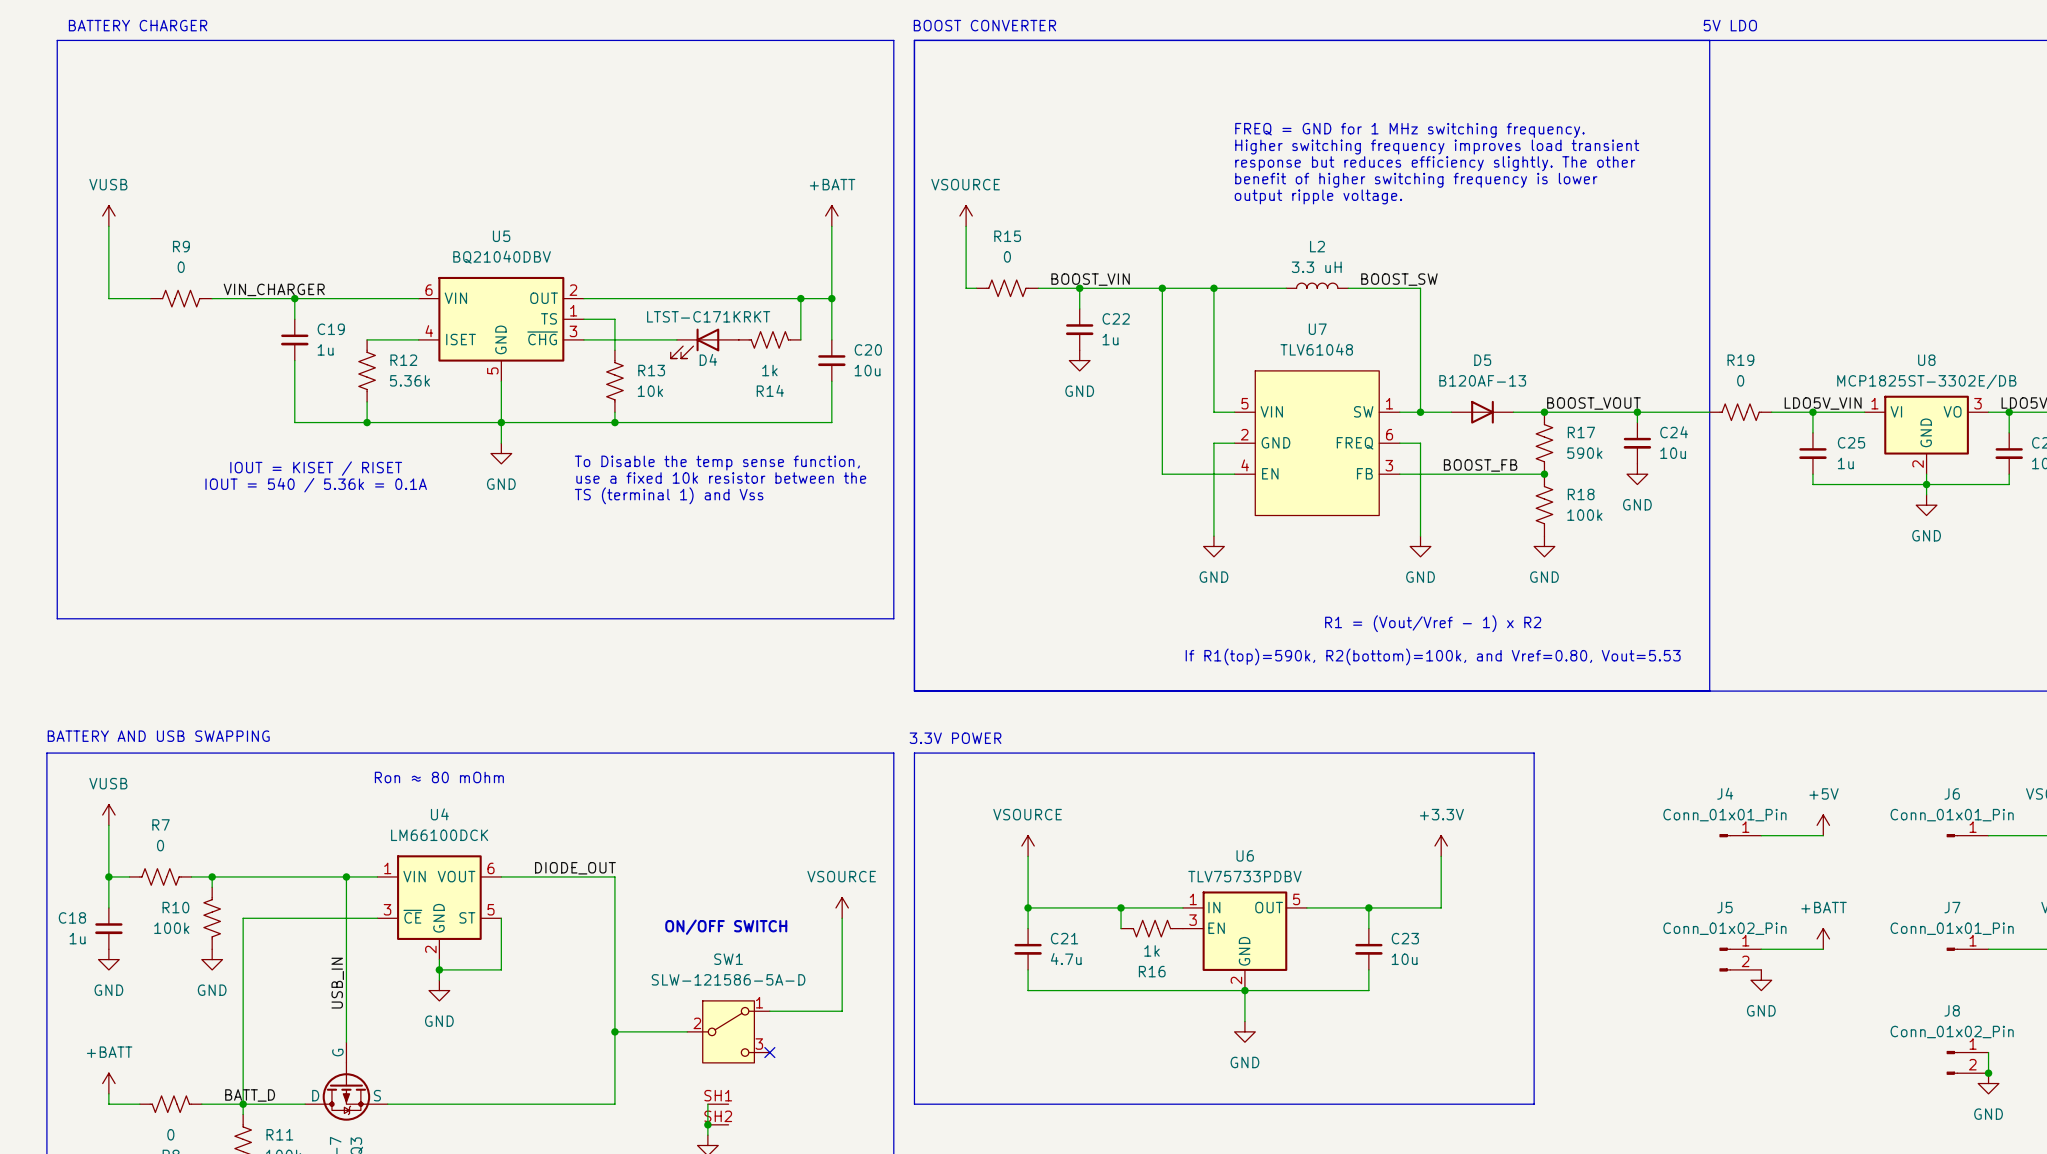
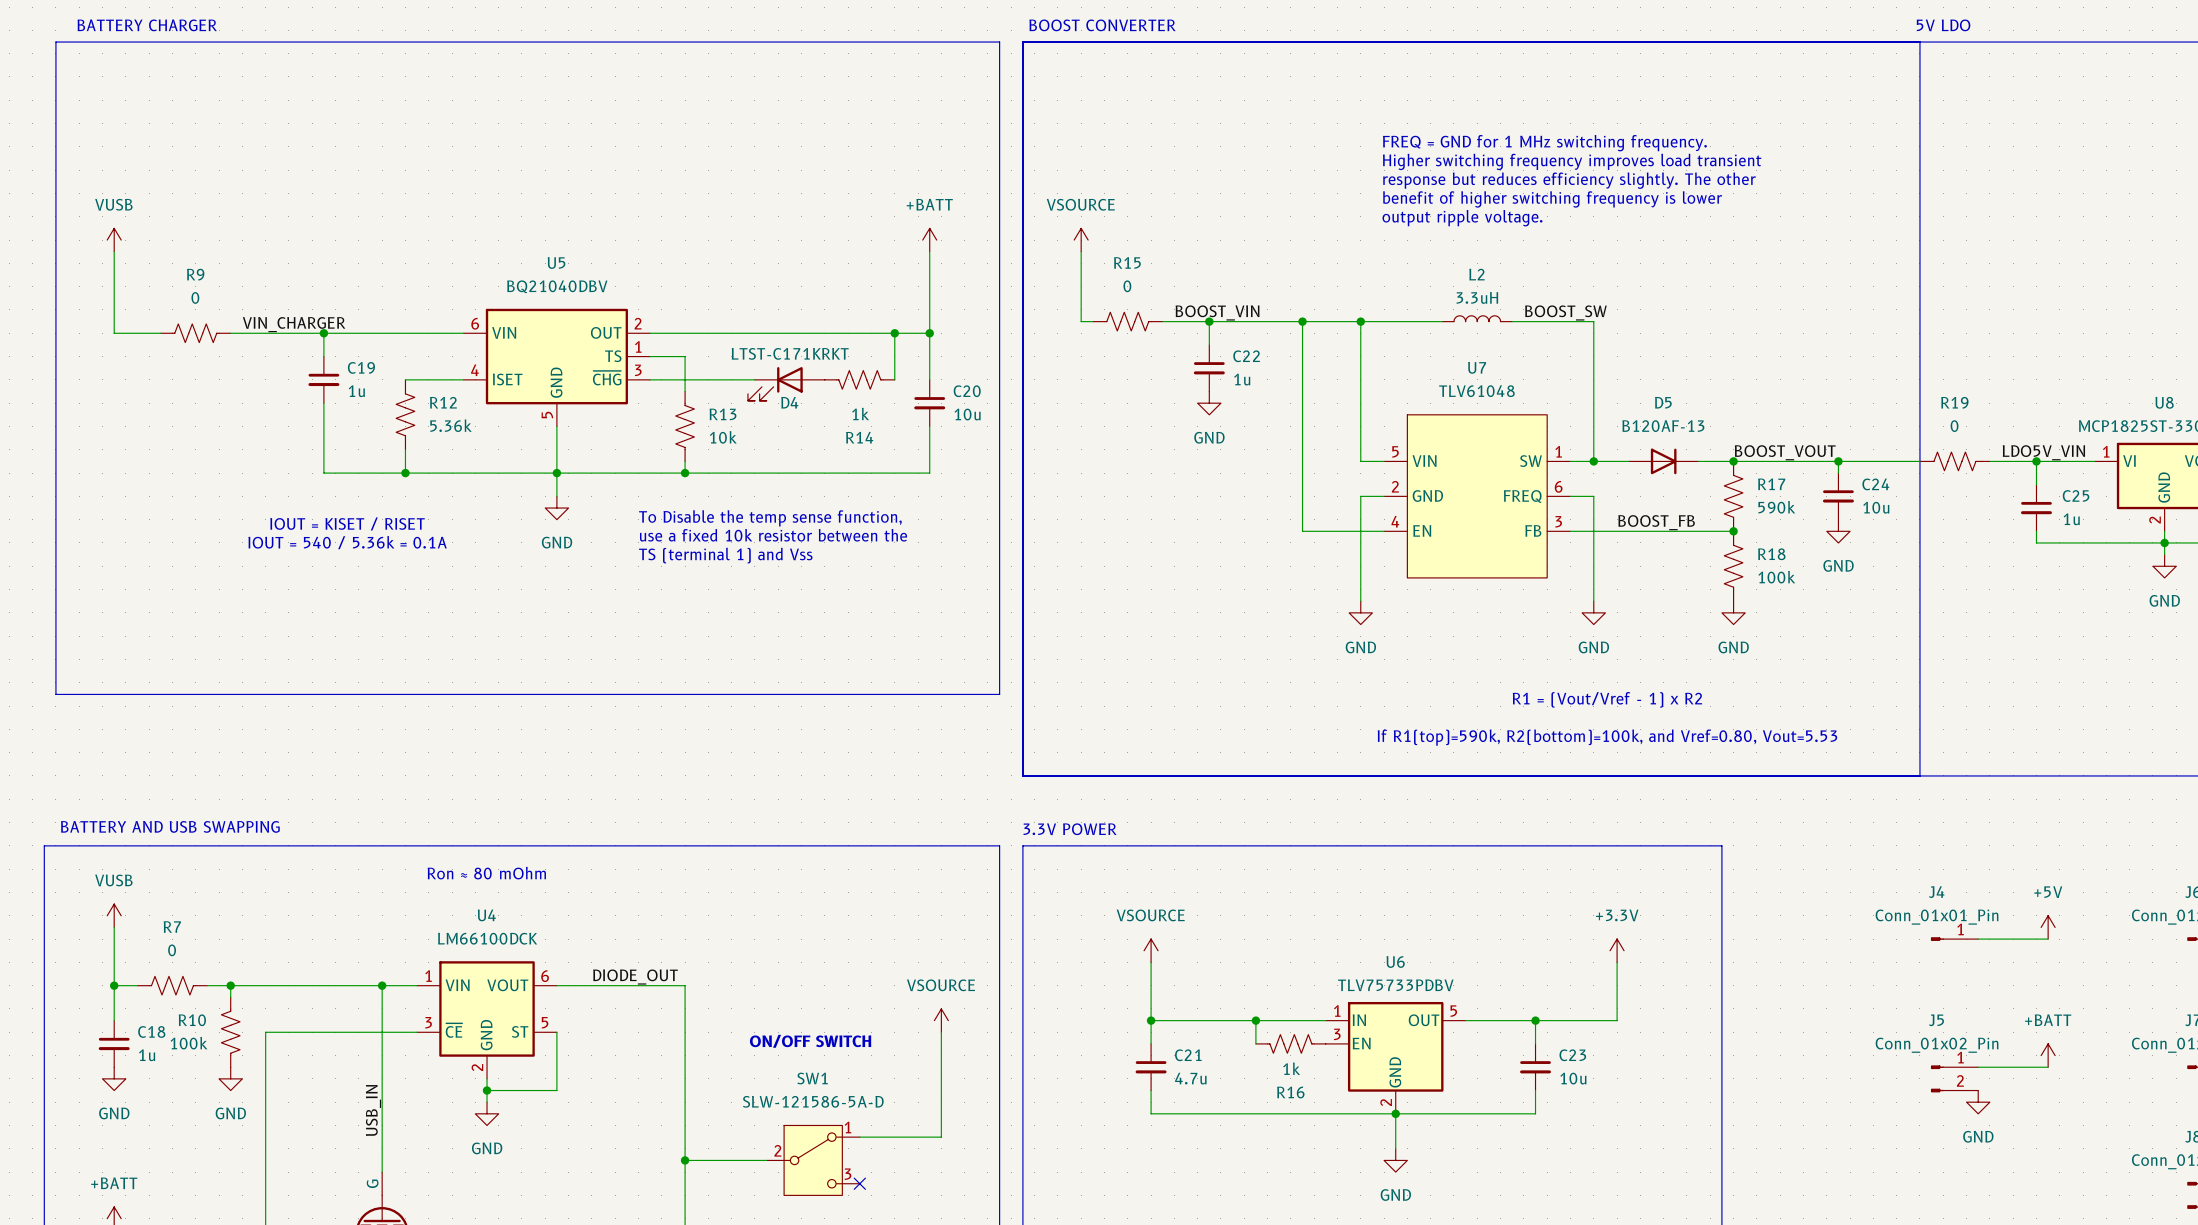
L2 value: 3.3 uH (1316, 267) -> 3.3uH (1477, 297)
C18 name position: C18 (72, 917) -> C18 (151, 1031)
C18 value position: 1u (77, 938) -> 1u (147, 1055)

